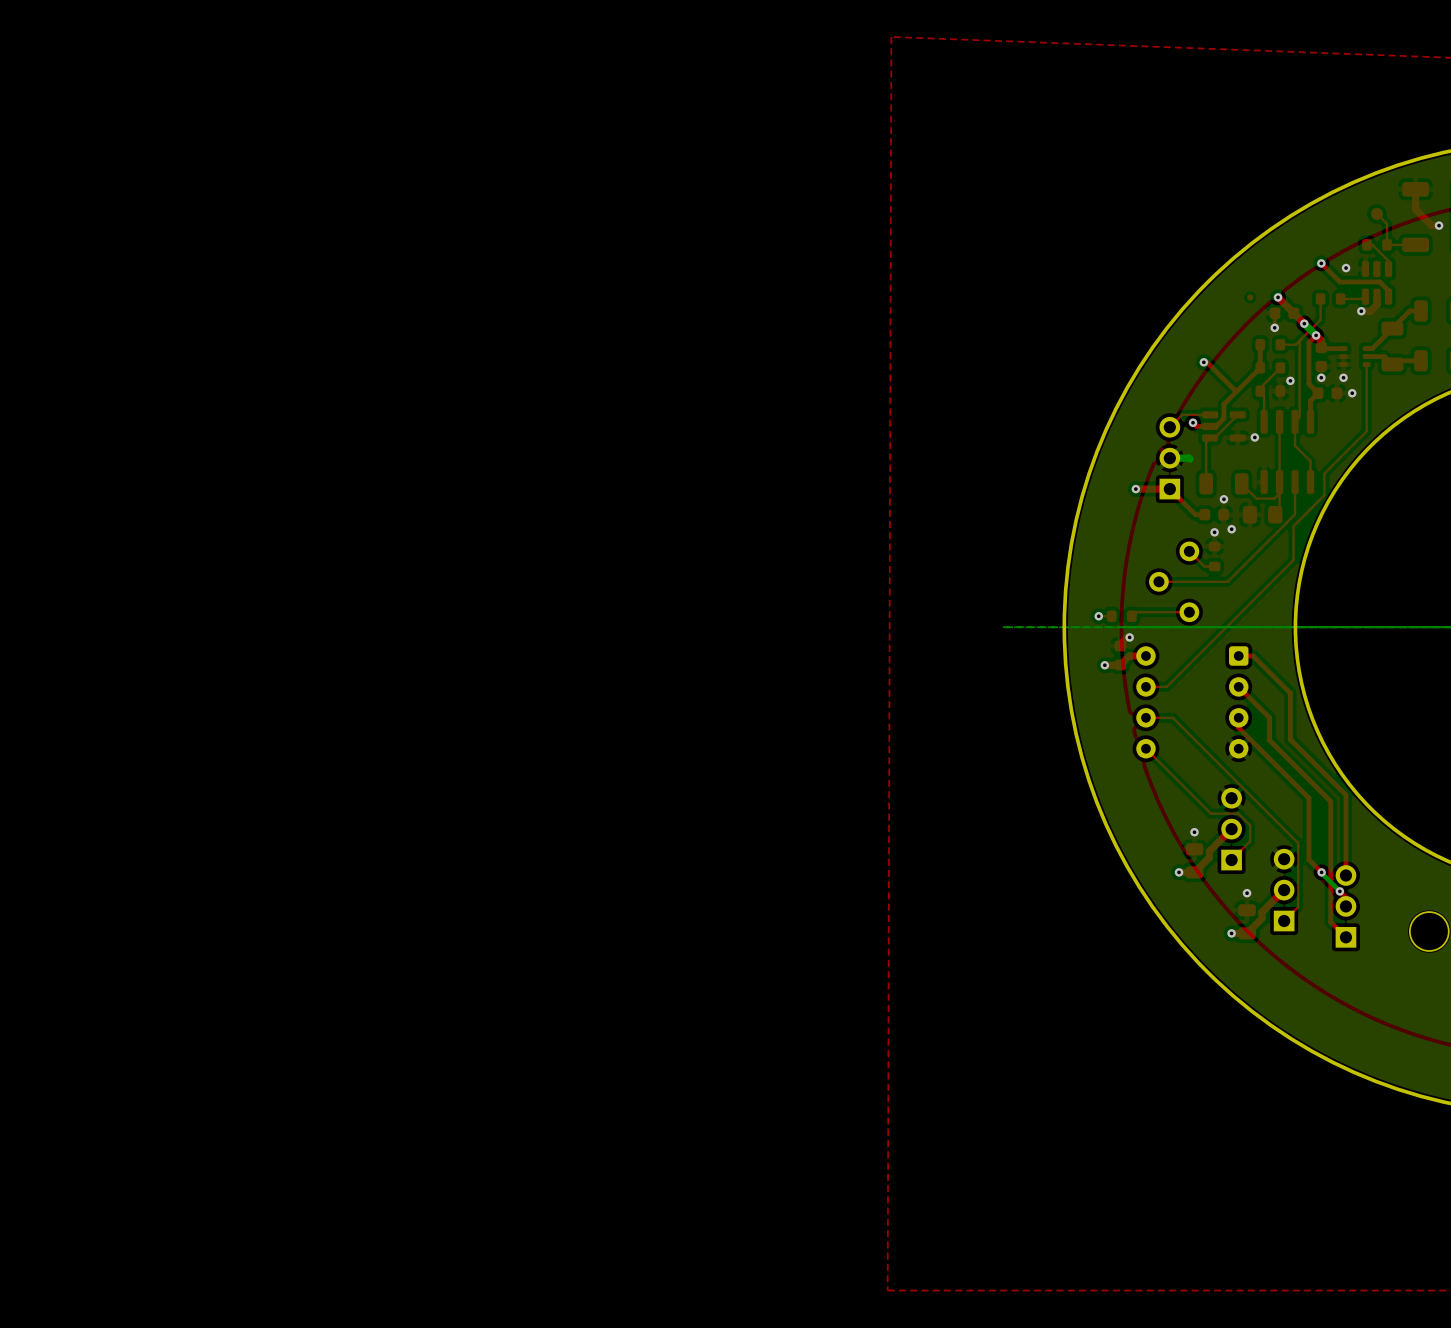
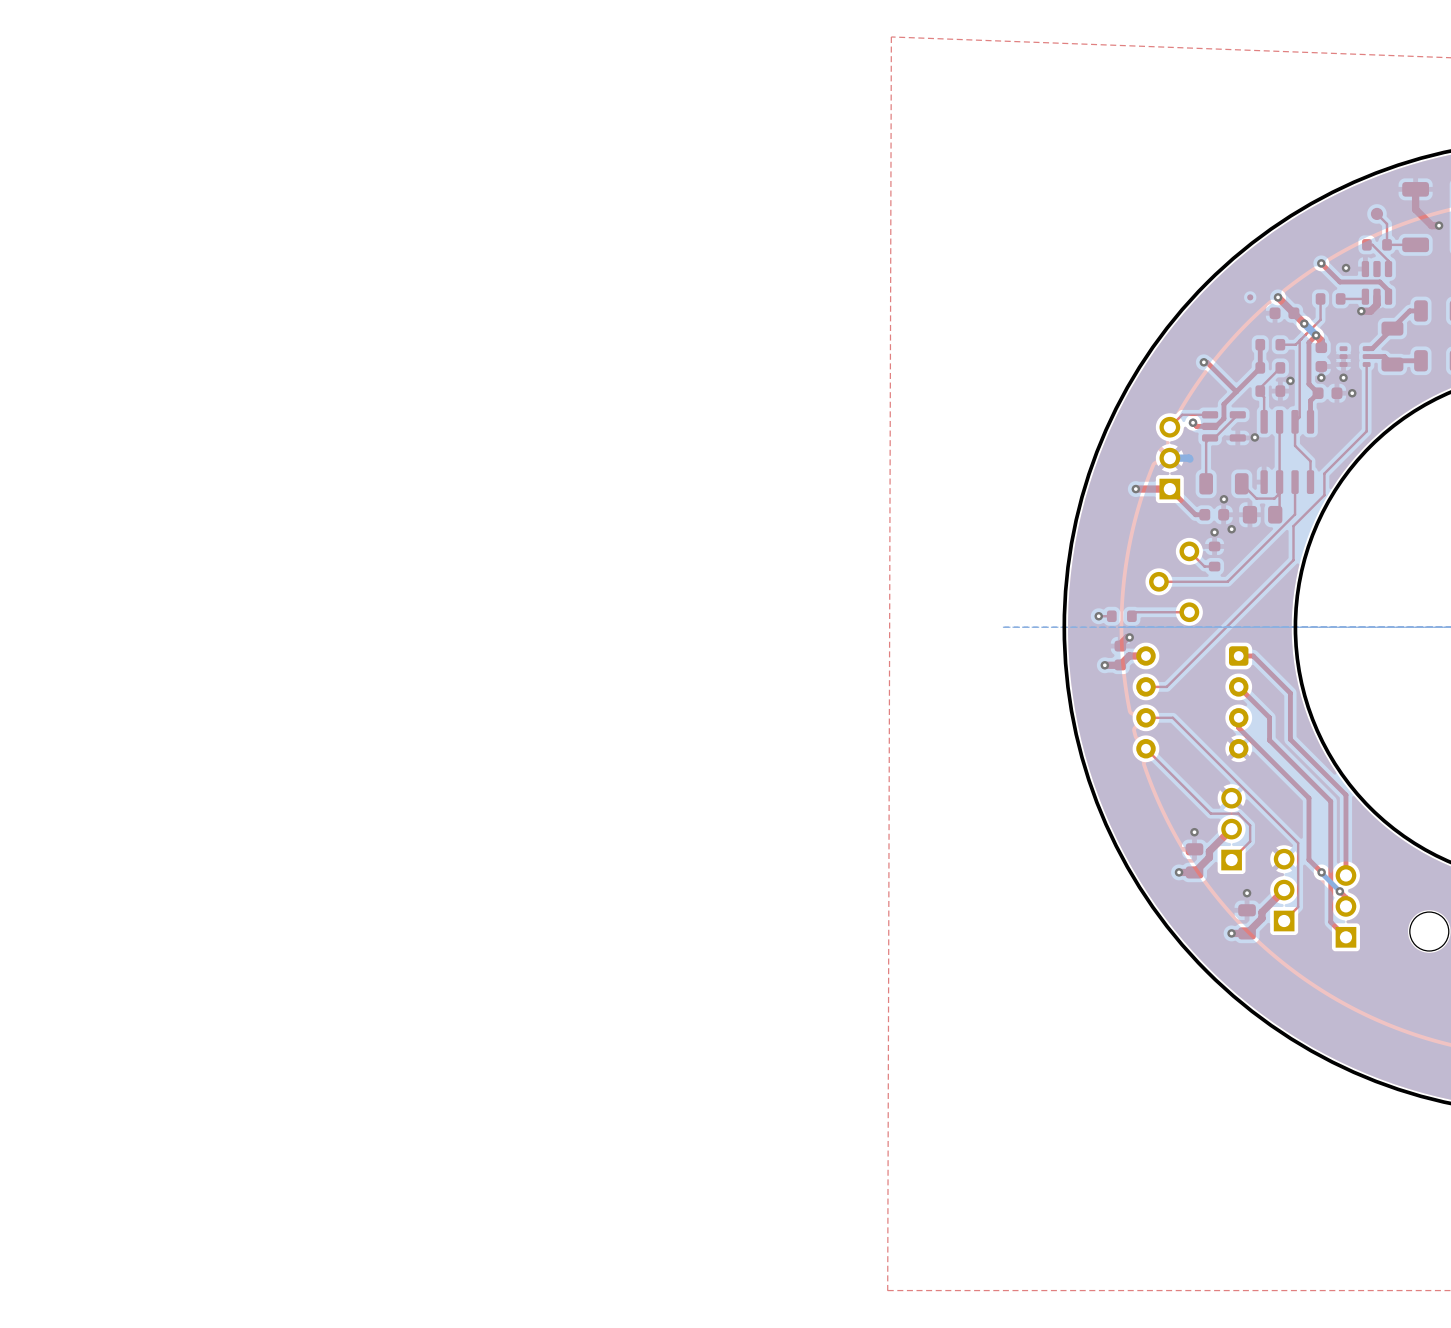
via: (1274, 327) -> none
top track: (1321, 347) (1343, 348) -> none

